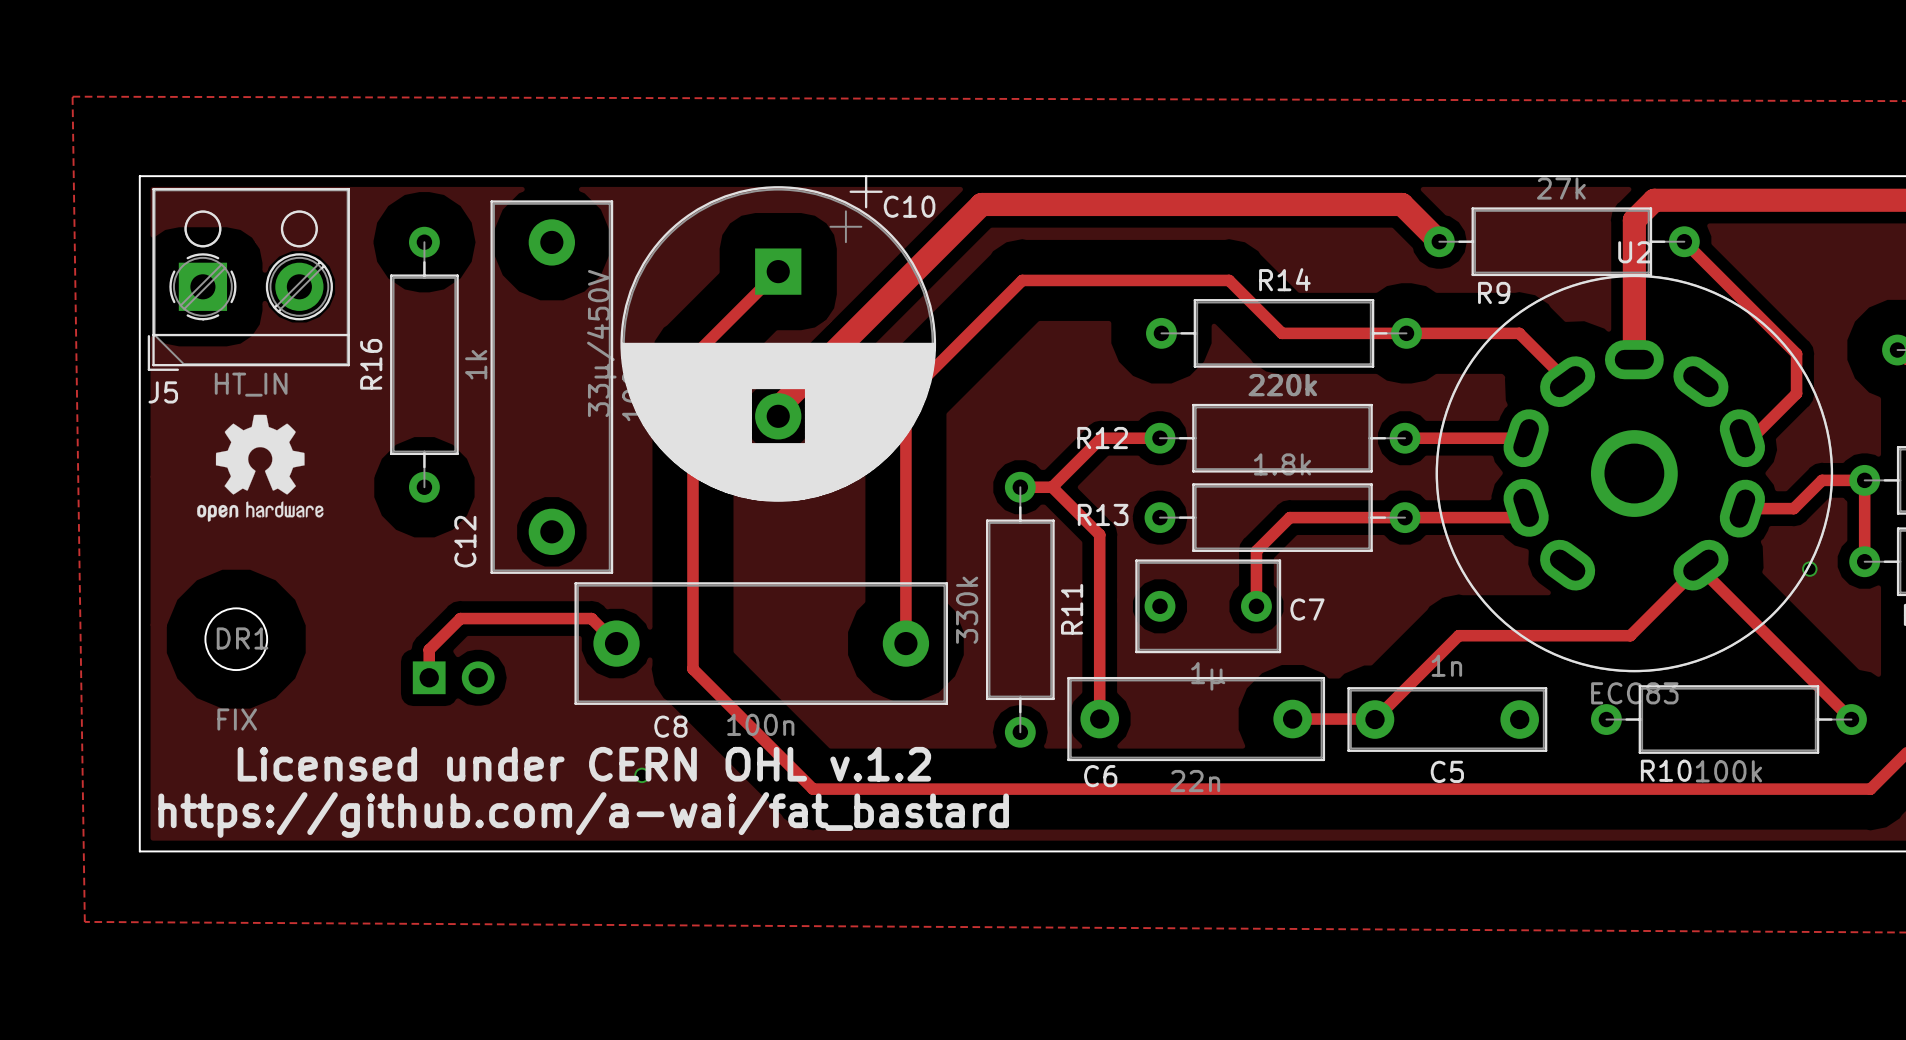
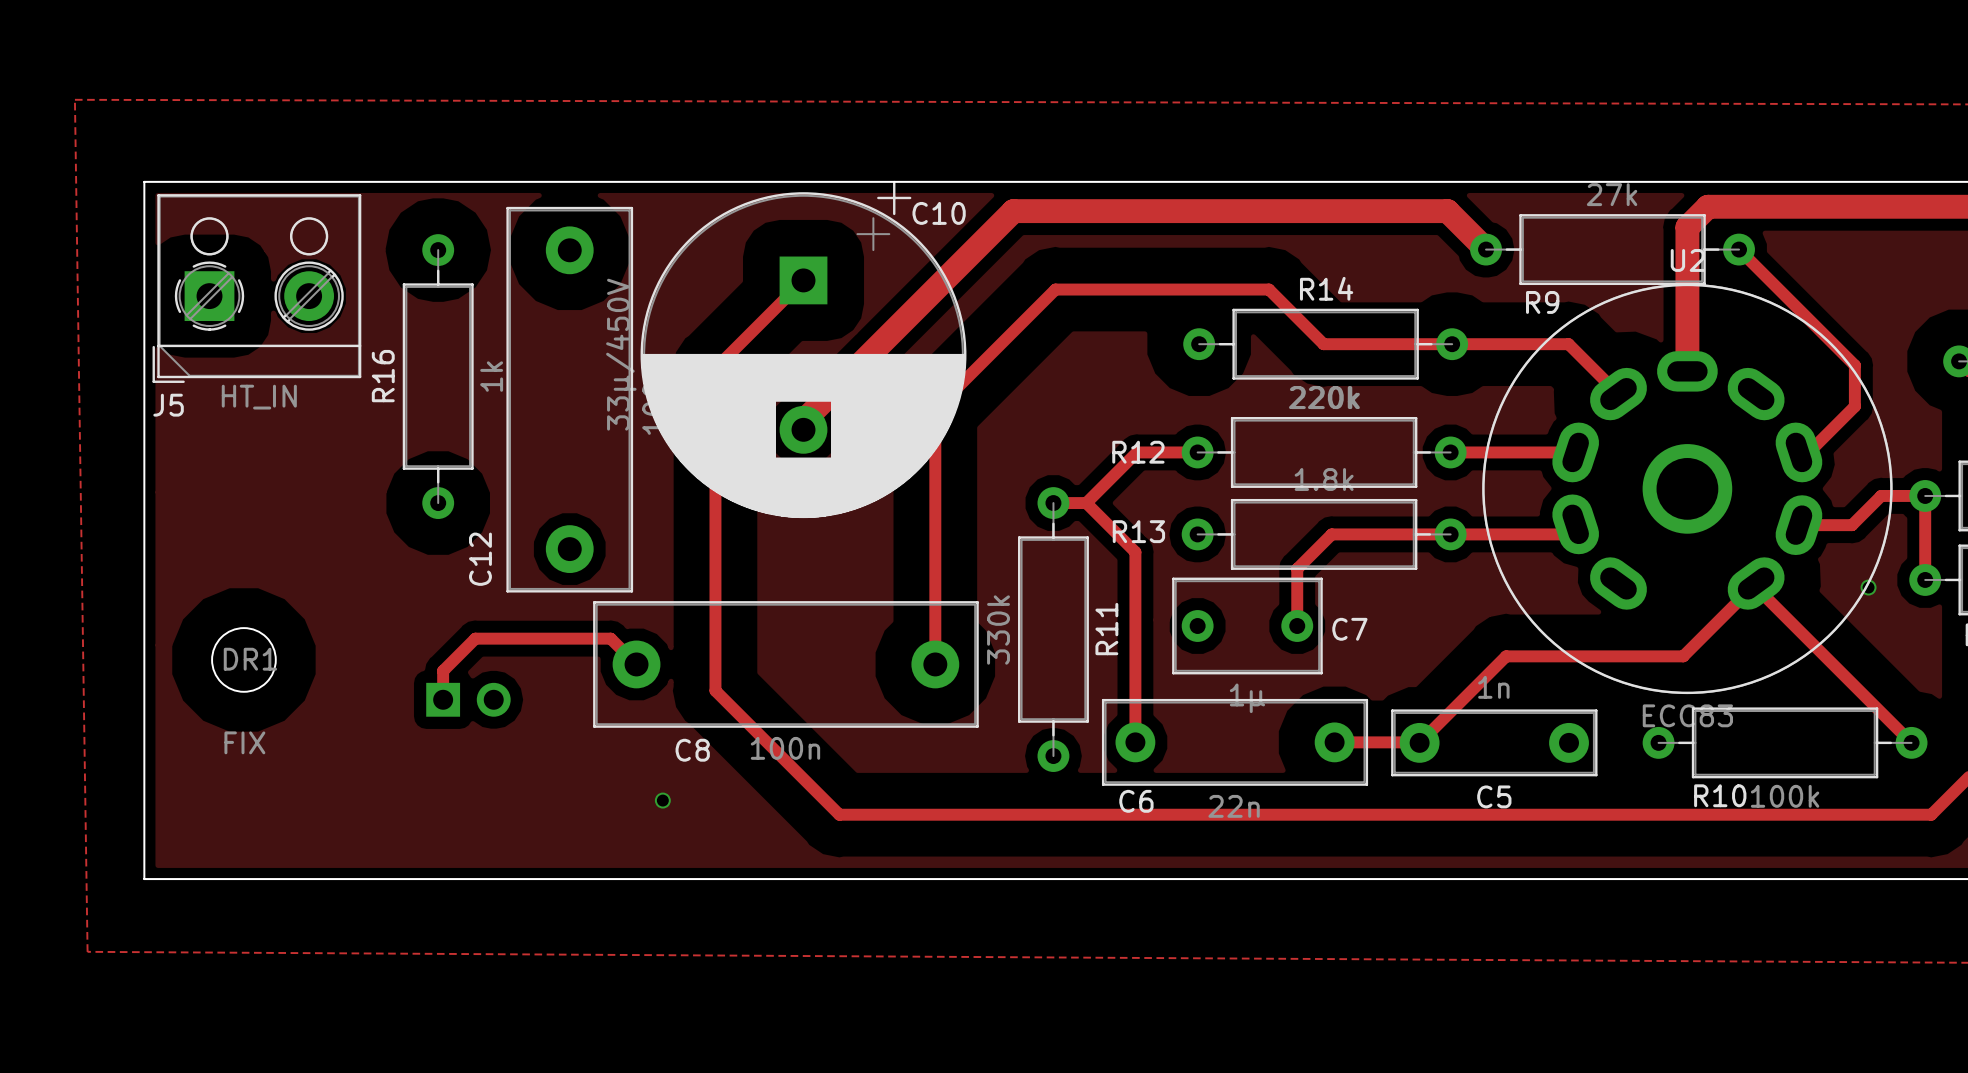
drawing: [197, 414, 324, 522] -> none
text: Licensed under CERN OHL v.1.2 (584, 764) -> none
text: https://github.com/a-wai/fat_bastard (583, 814) -> none

